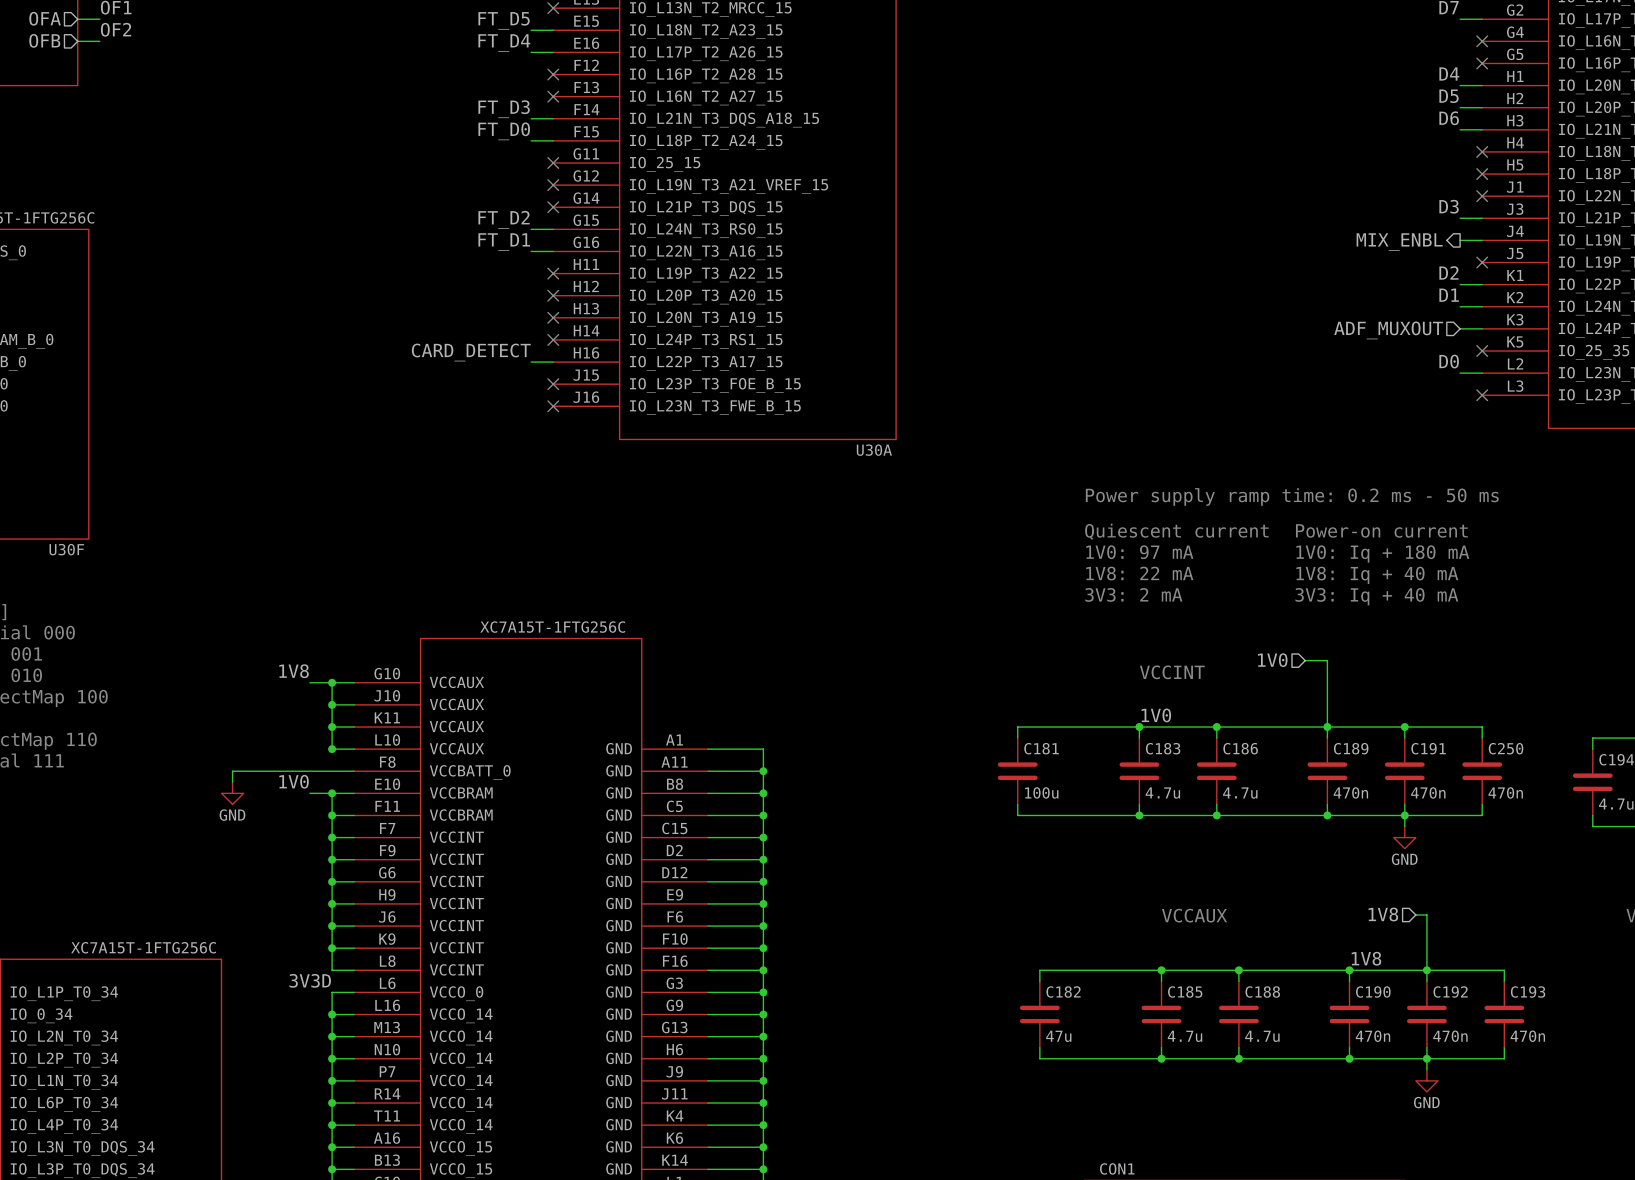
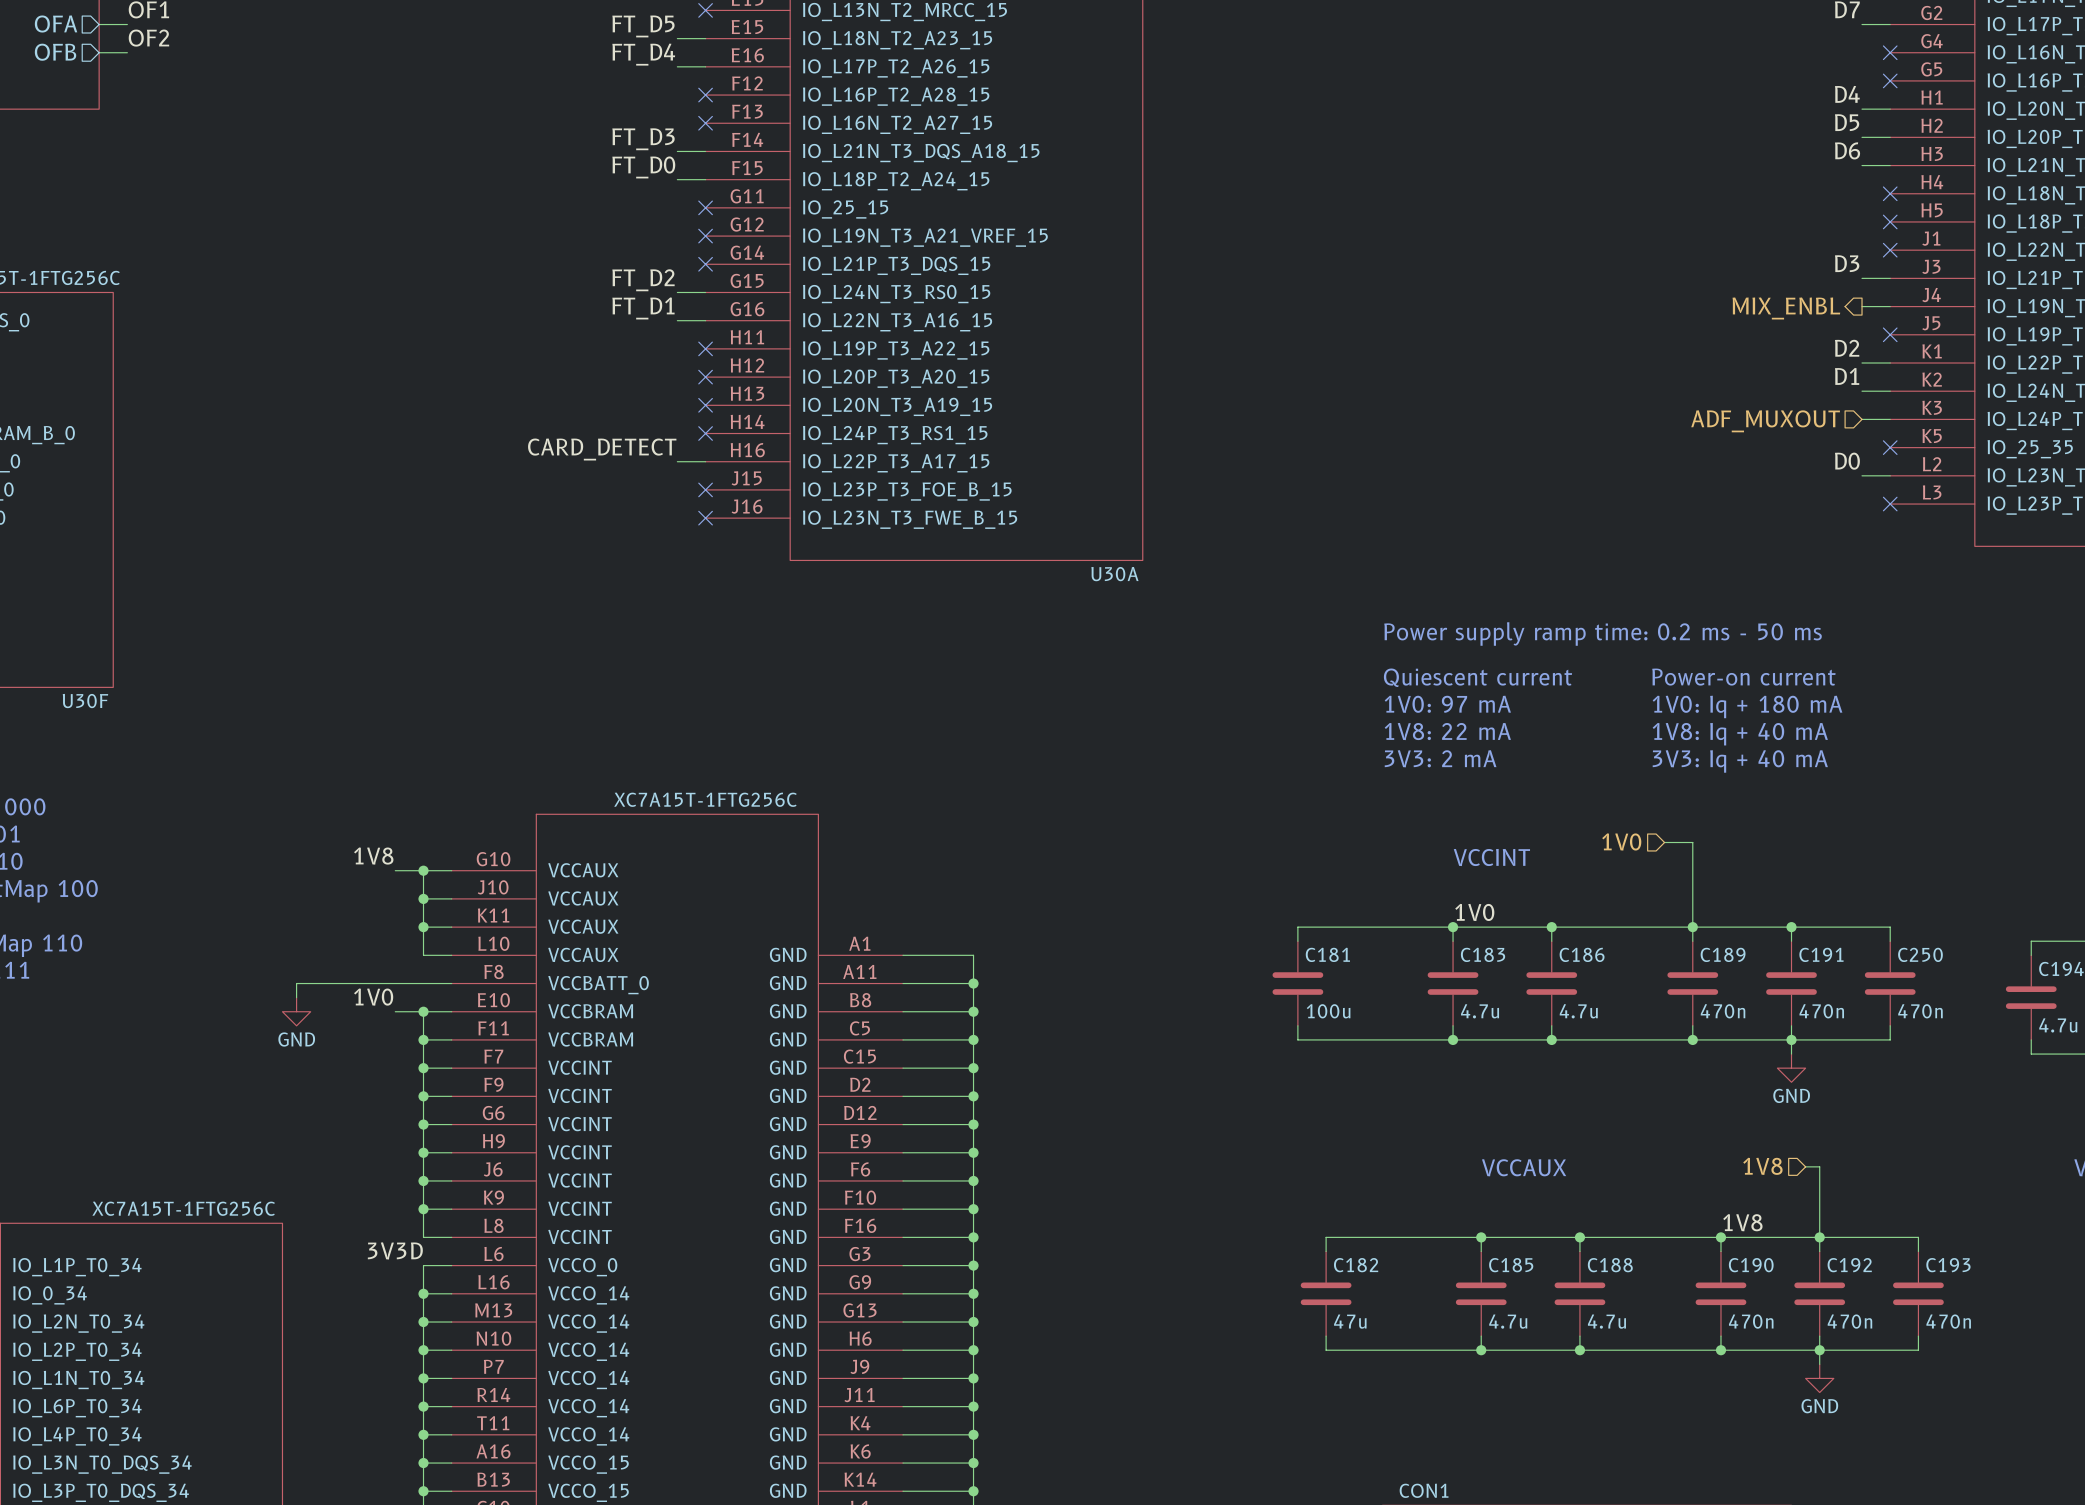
junction: (332, 749) -> none

